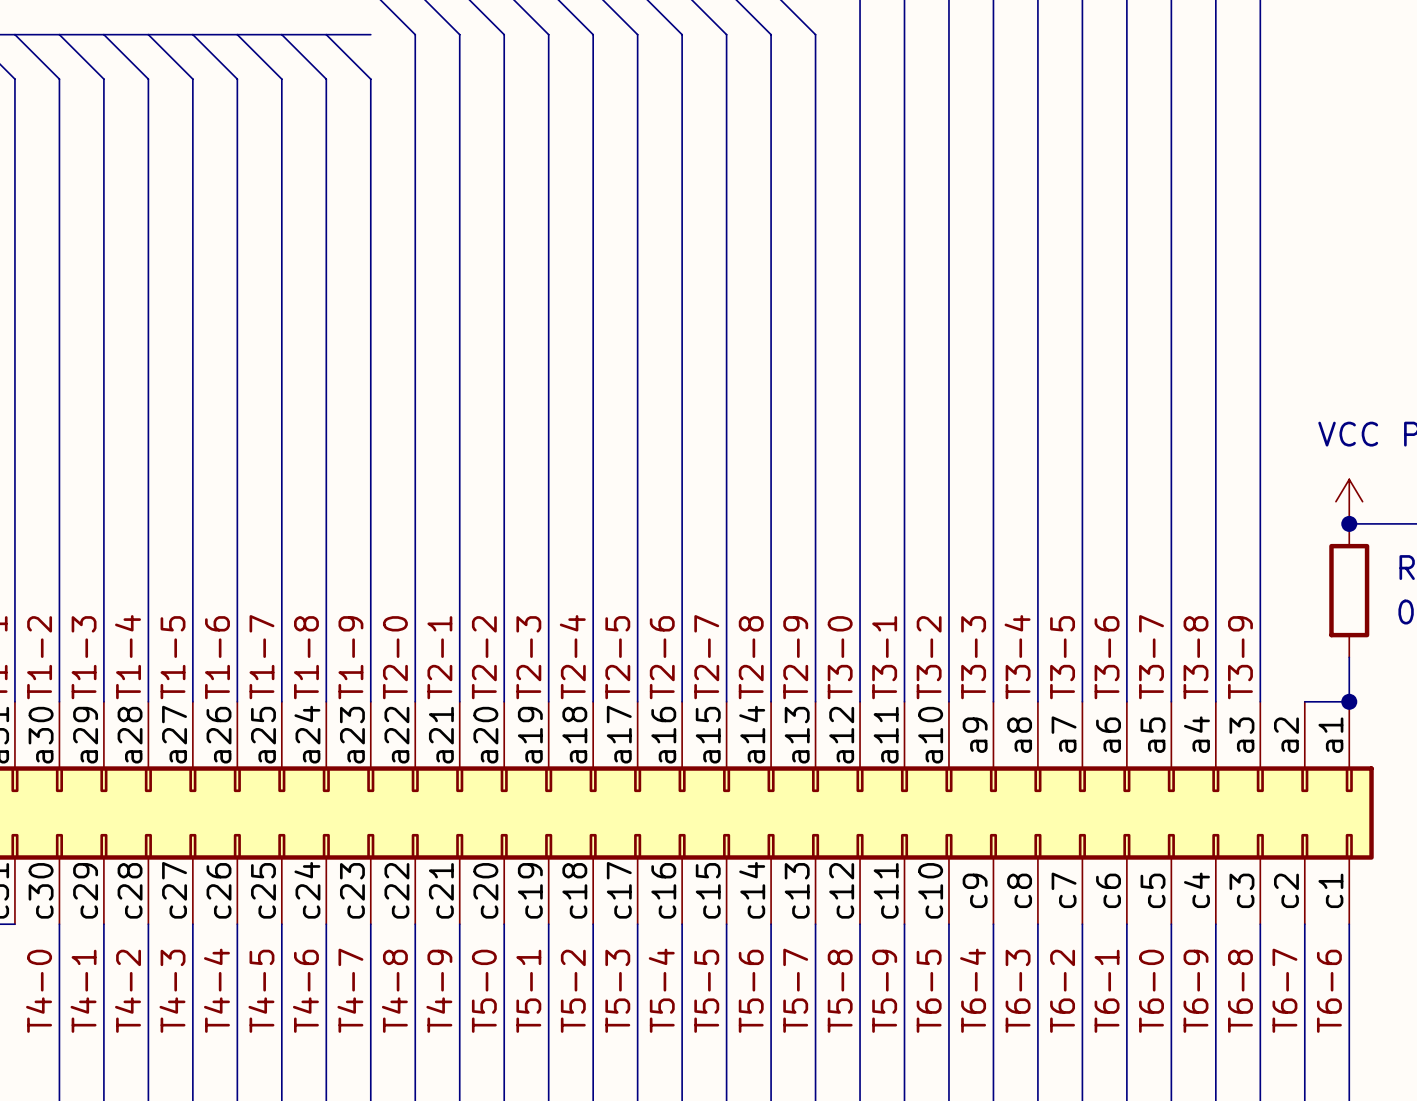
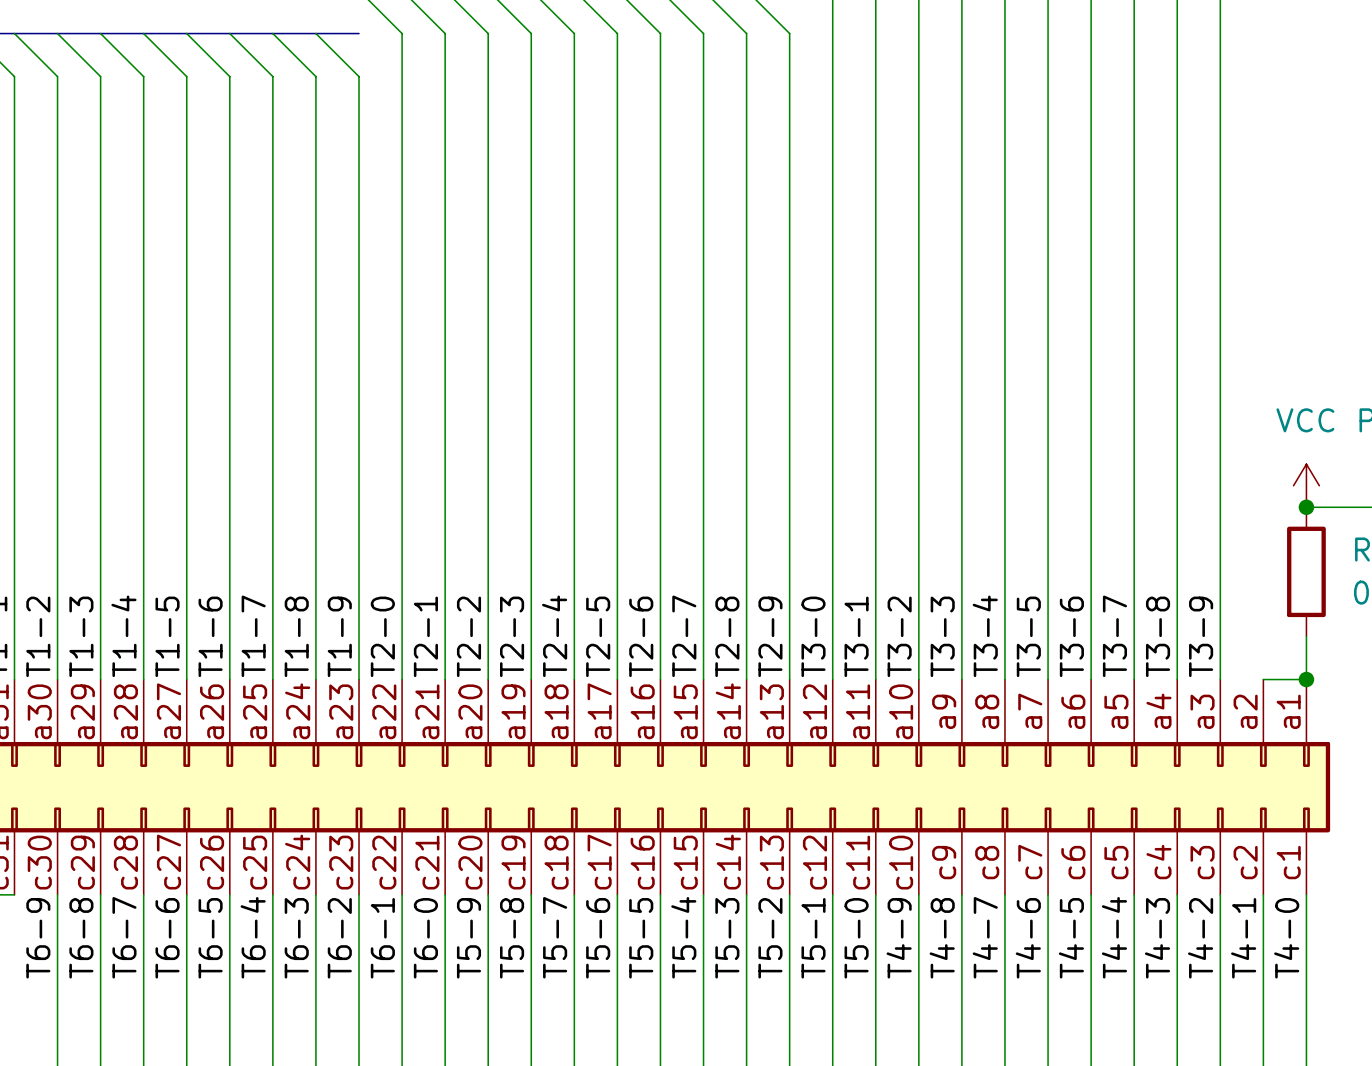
label: none -> T6-7 (124, 937)
label: none -> T4-7 (985, 937)
label: none -> T4-4 (1114, 937)
label: none -> T6-9 (38, 938)
label: none -> T6-8 (81, 938)
label: none -> T6-6 (167, 938)
label: none -> T6-3 (296, 938)
label: none -> T6-2 (339, 938)
label: none -> T6-1 (382, 938)
label: none -> T6-0 (425, 938)
label: none -> T4-9 (899, 938)
label: none -> T4-8 (942, 938)
label: none -> T4-6 (1028, 938)
label: none -> T4-5 (1071, 938)
label: none -> T4-3 (1157, 938)
label: none -> T4-2 (1200, 938)
label: none -> T4-1 (1243, 938)
label: none -> T4-0 (1286, 938)
label: T4-4 (216, 990) -> T6-4 (253, 937)
label: T4-7 (350, 990) -> none
label position: T5-4 (661, 990) -> T5-4 (683, 937)
label position: T5-7 (795, 990) -> T5-7 (555, 937)
label: T6-4 (973, 990) -> none
label: T6-7 (1284, 990) -> none
label: T4-0 (39, 991) -> none
label: T4-1 (83, 991) -> none
label: T4-2 (128, 991) -> none
label: T4-3 (172, 991) -> none
label: T4-5 (261, 991) -> T6-5 (210, 938)
label: T4-6 (305, 991) -> none
label: T4-8 (394, 991) -> none
label: T4-9 (439, 991) -> none
label position: T5-0 (484, 991) -> T5-0 (856, 938)
label position: T5-1 (528, 991) -> T5-1 (813, 938)
label position: T5-2 (573, 991) -> T5-2 (770, 938)
label position: T5-3 (617, 991) -> T5-3 (727, 938)
label position: T5-5 (706, 991) -> T5-5 (641, 938)
label position: T5-6 (751, 991) -> T5-6 (598, 938)
label position: T5-8 (840, 991) -> T5-8 (512, 938)
label position: T5-9 (884, 991) -> T5-9 (468, 938)
label: T6-5 (929, 991) -> none
label: T6-3 (1018, 991) -> none
label: T6-2 (1062, 991) -> none
label: T6-1 (1107, 991) -> none
label: T6-0 (1151, 991) -> none
label: T6-9 (1195, 991) -> none
label: T6-8 (1240, 991) -> none
label: T6-6 (1329, 991) -> none

